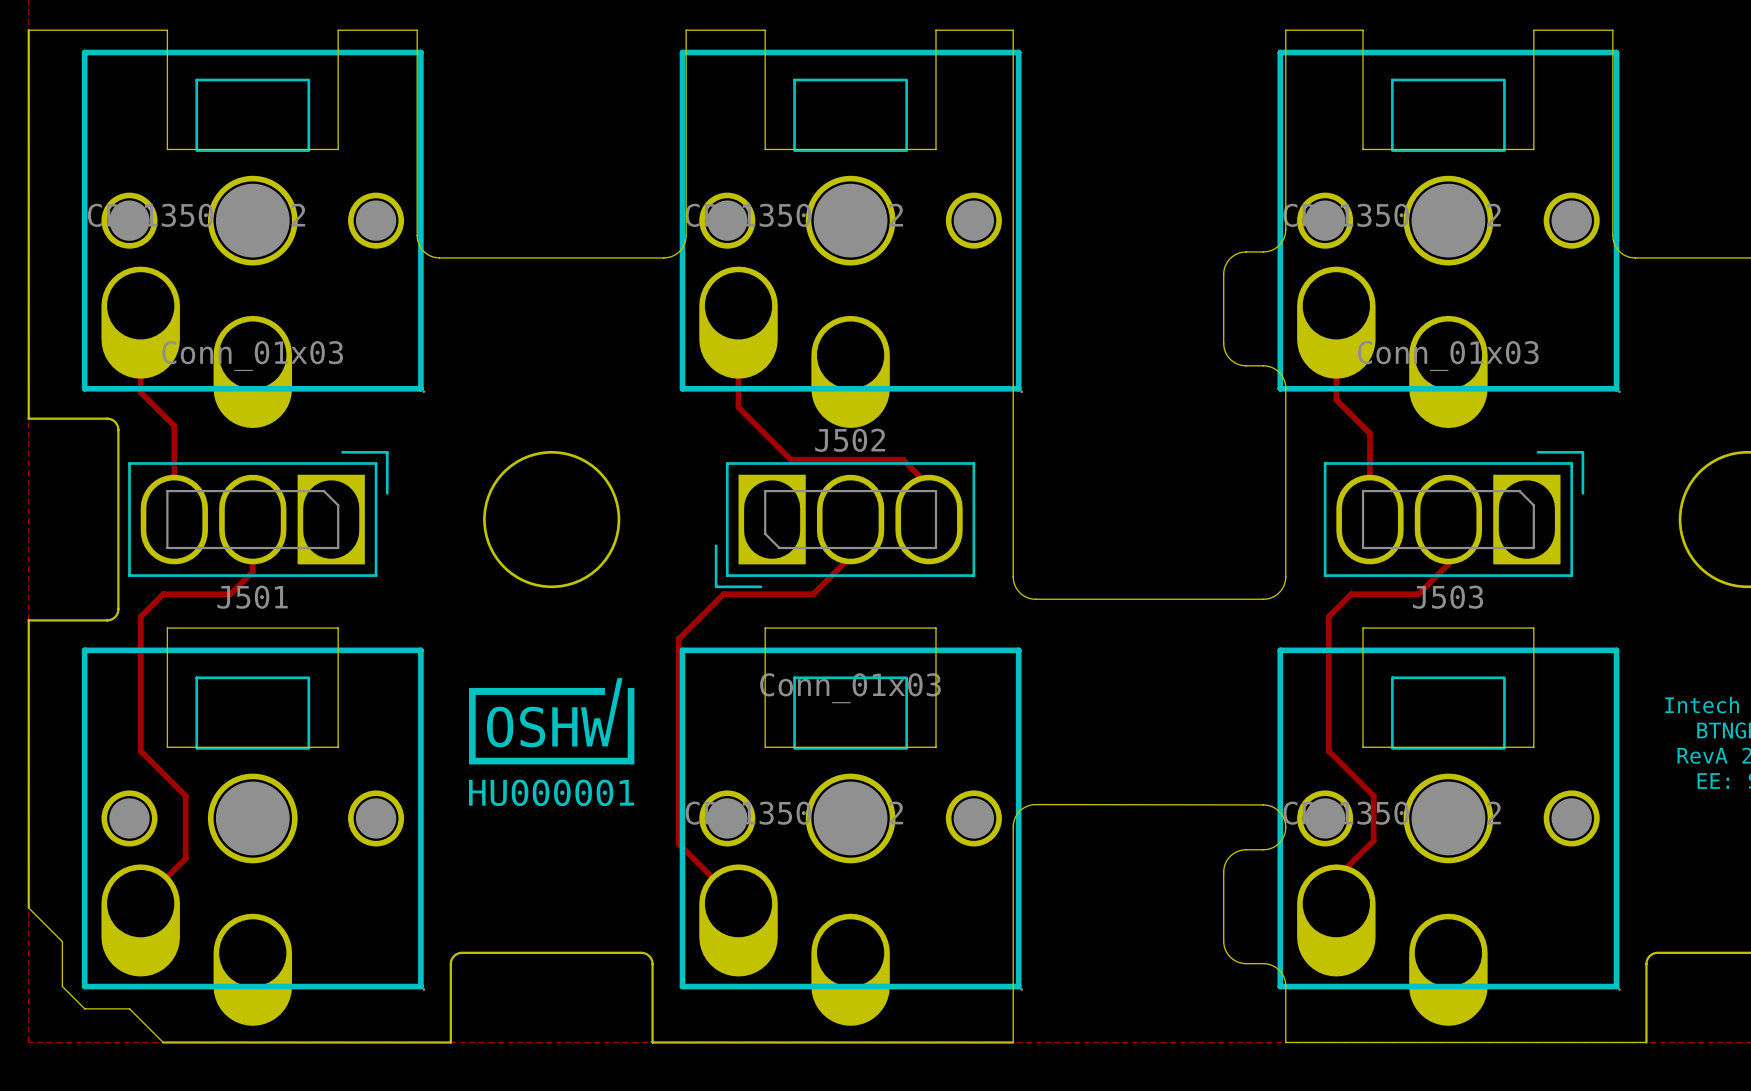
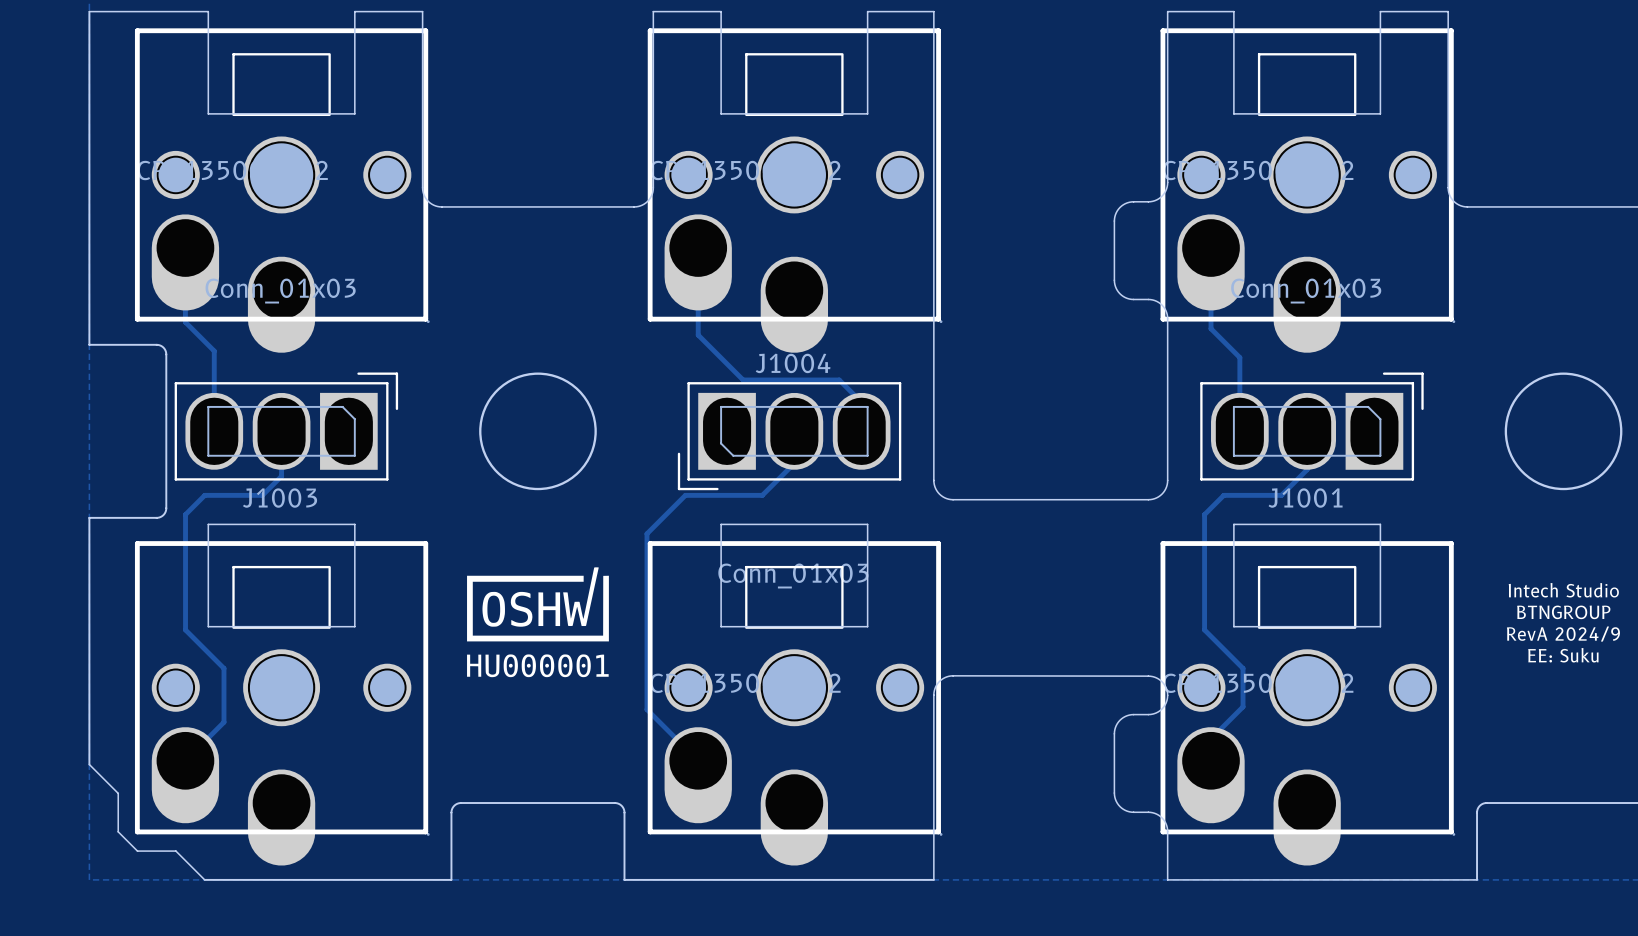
J502 name: J502 (850, 440) -> J1004 (793, 363)
J501 name: J501 (252, 597) -> J1003 (280, 498)
J503 name: J503 (1448, 597) -> J1001 (1305, 498)

